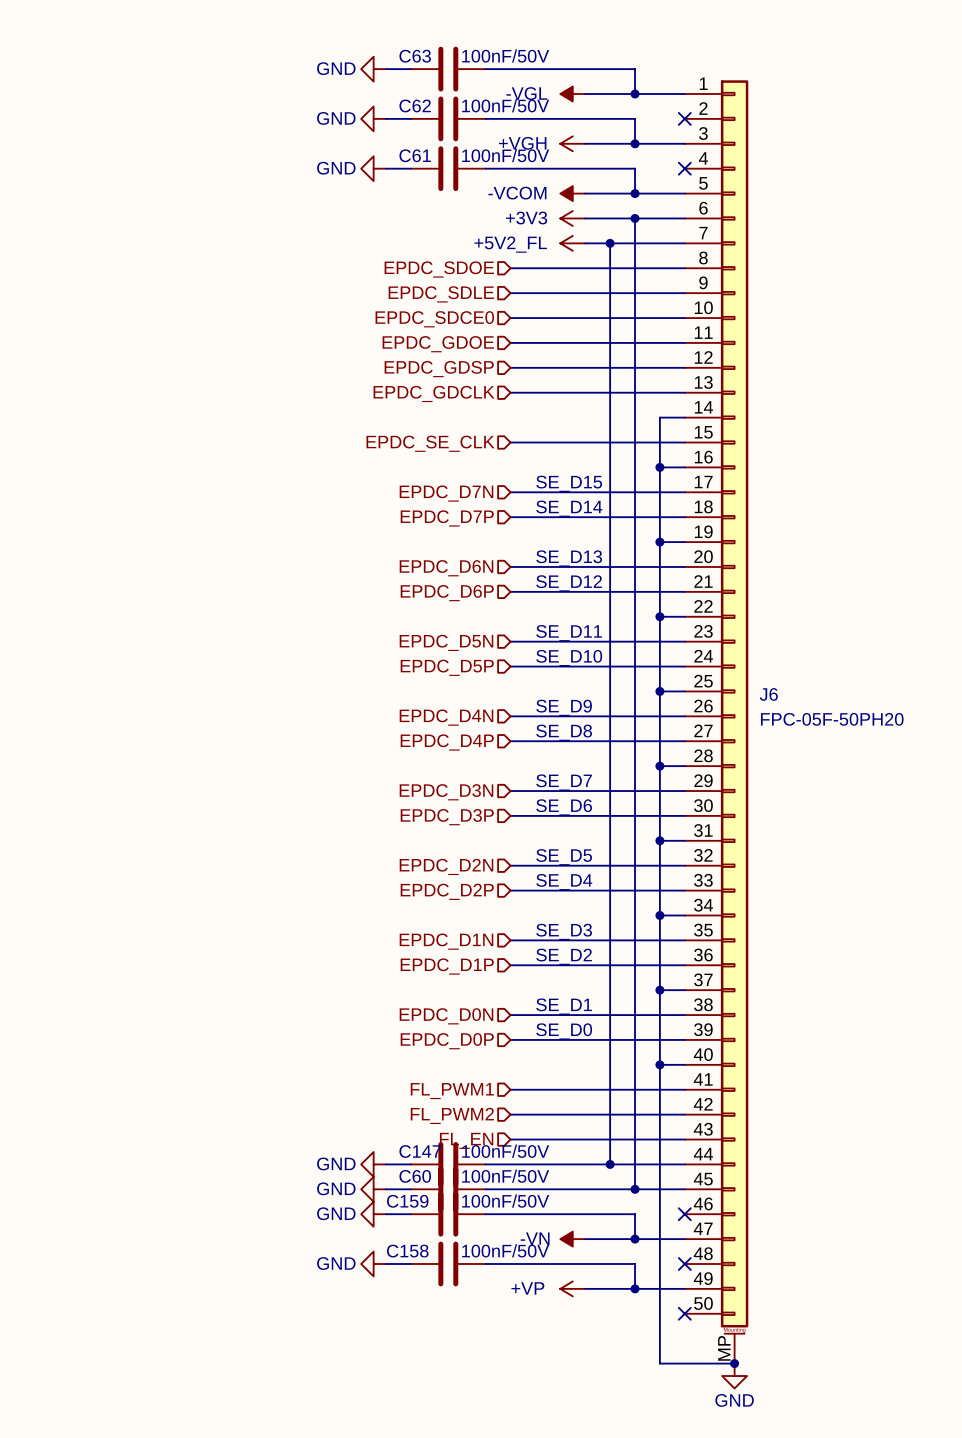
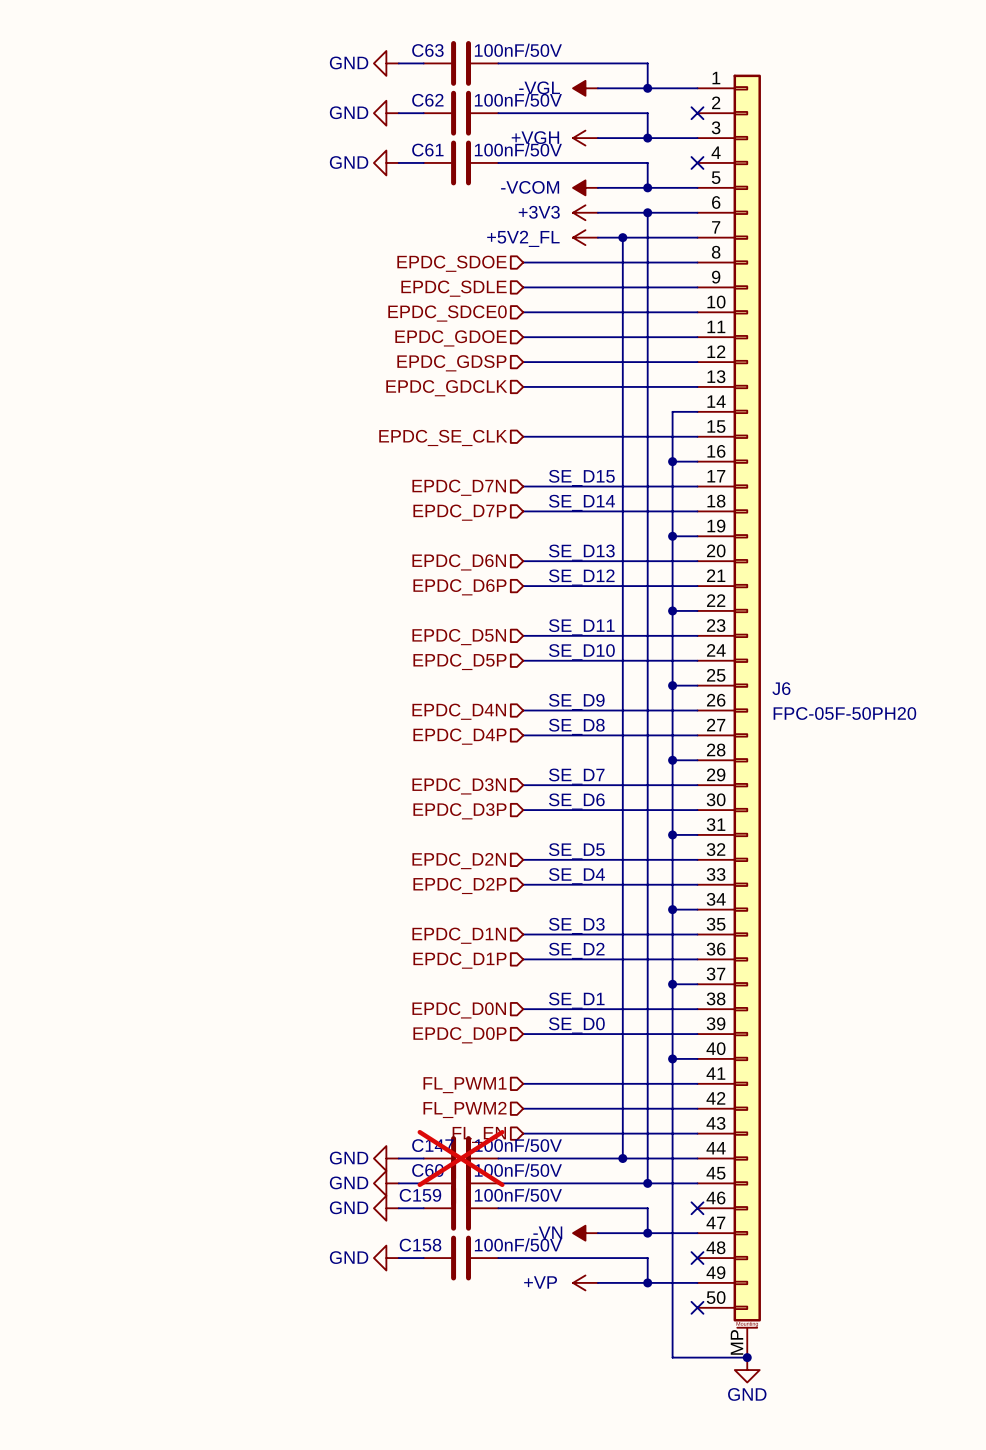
C147 do-not-place cross: none -> (461, 1158)

